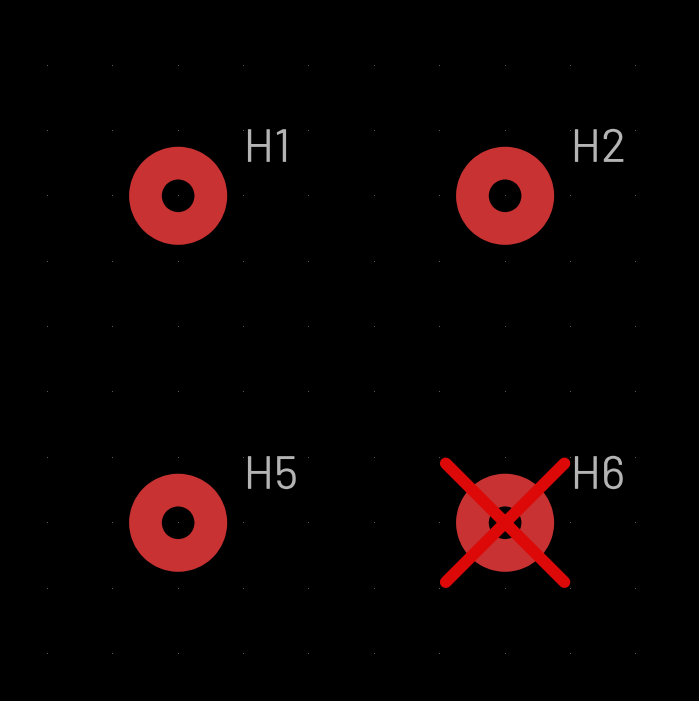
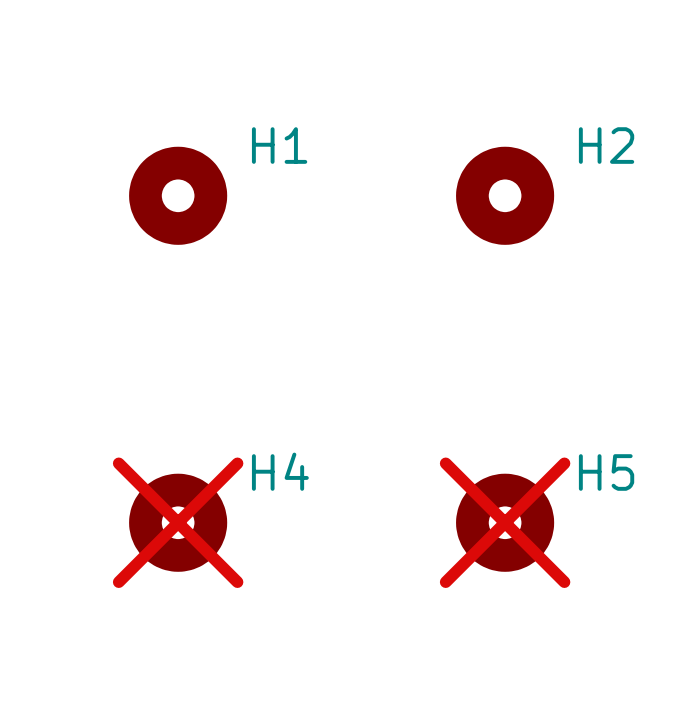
H5 name: H5 (271, 472) -> H4 (280, 471)
H6 name: H6 (598, 472) -> H5 (606, 472)
H5 do-not-place cross: none -> (178, 522)

